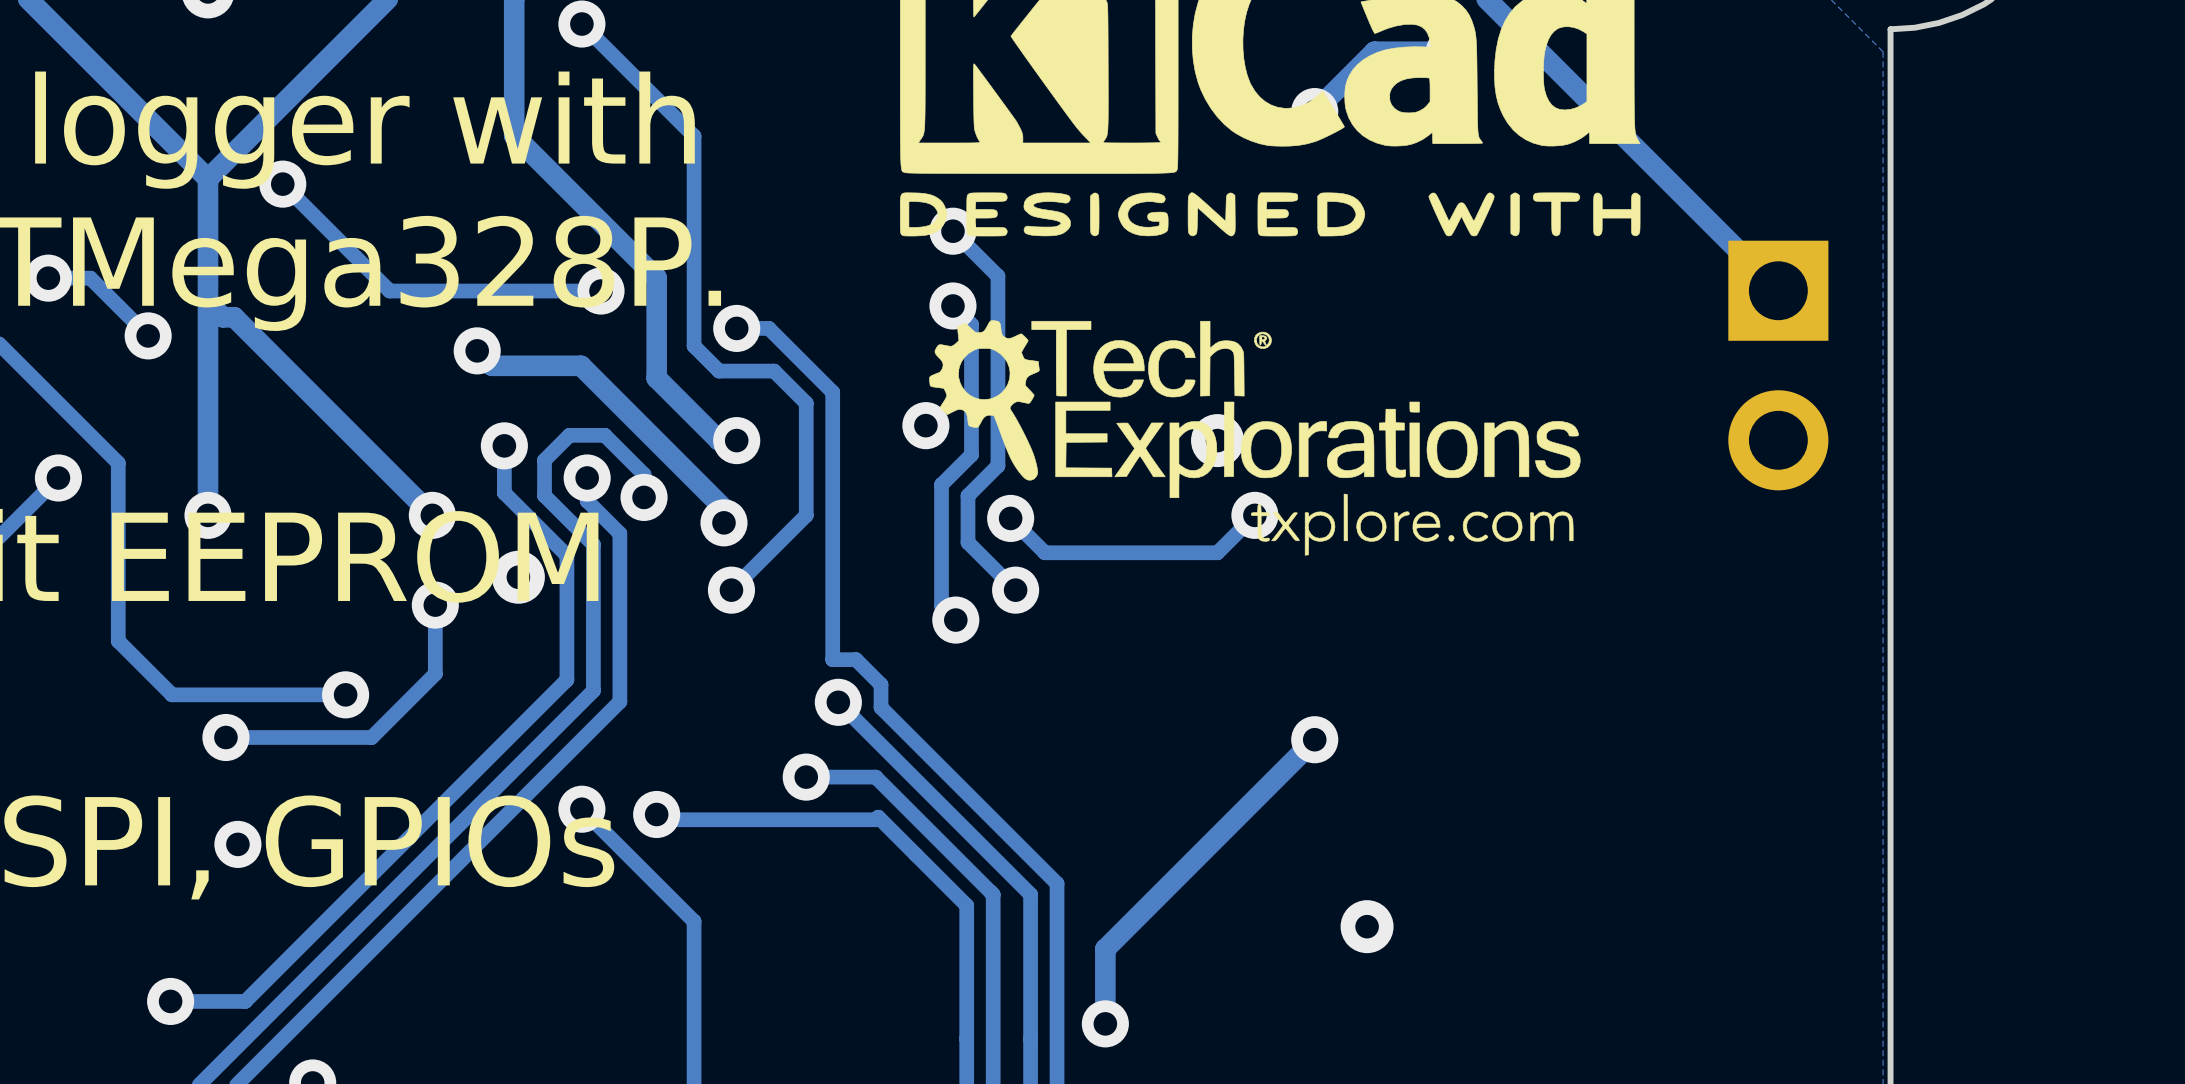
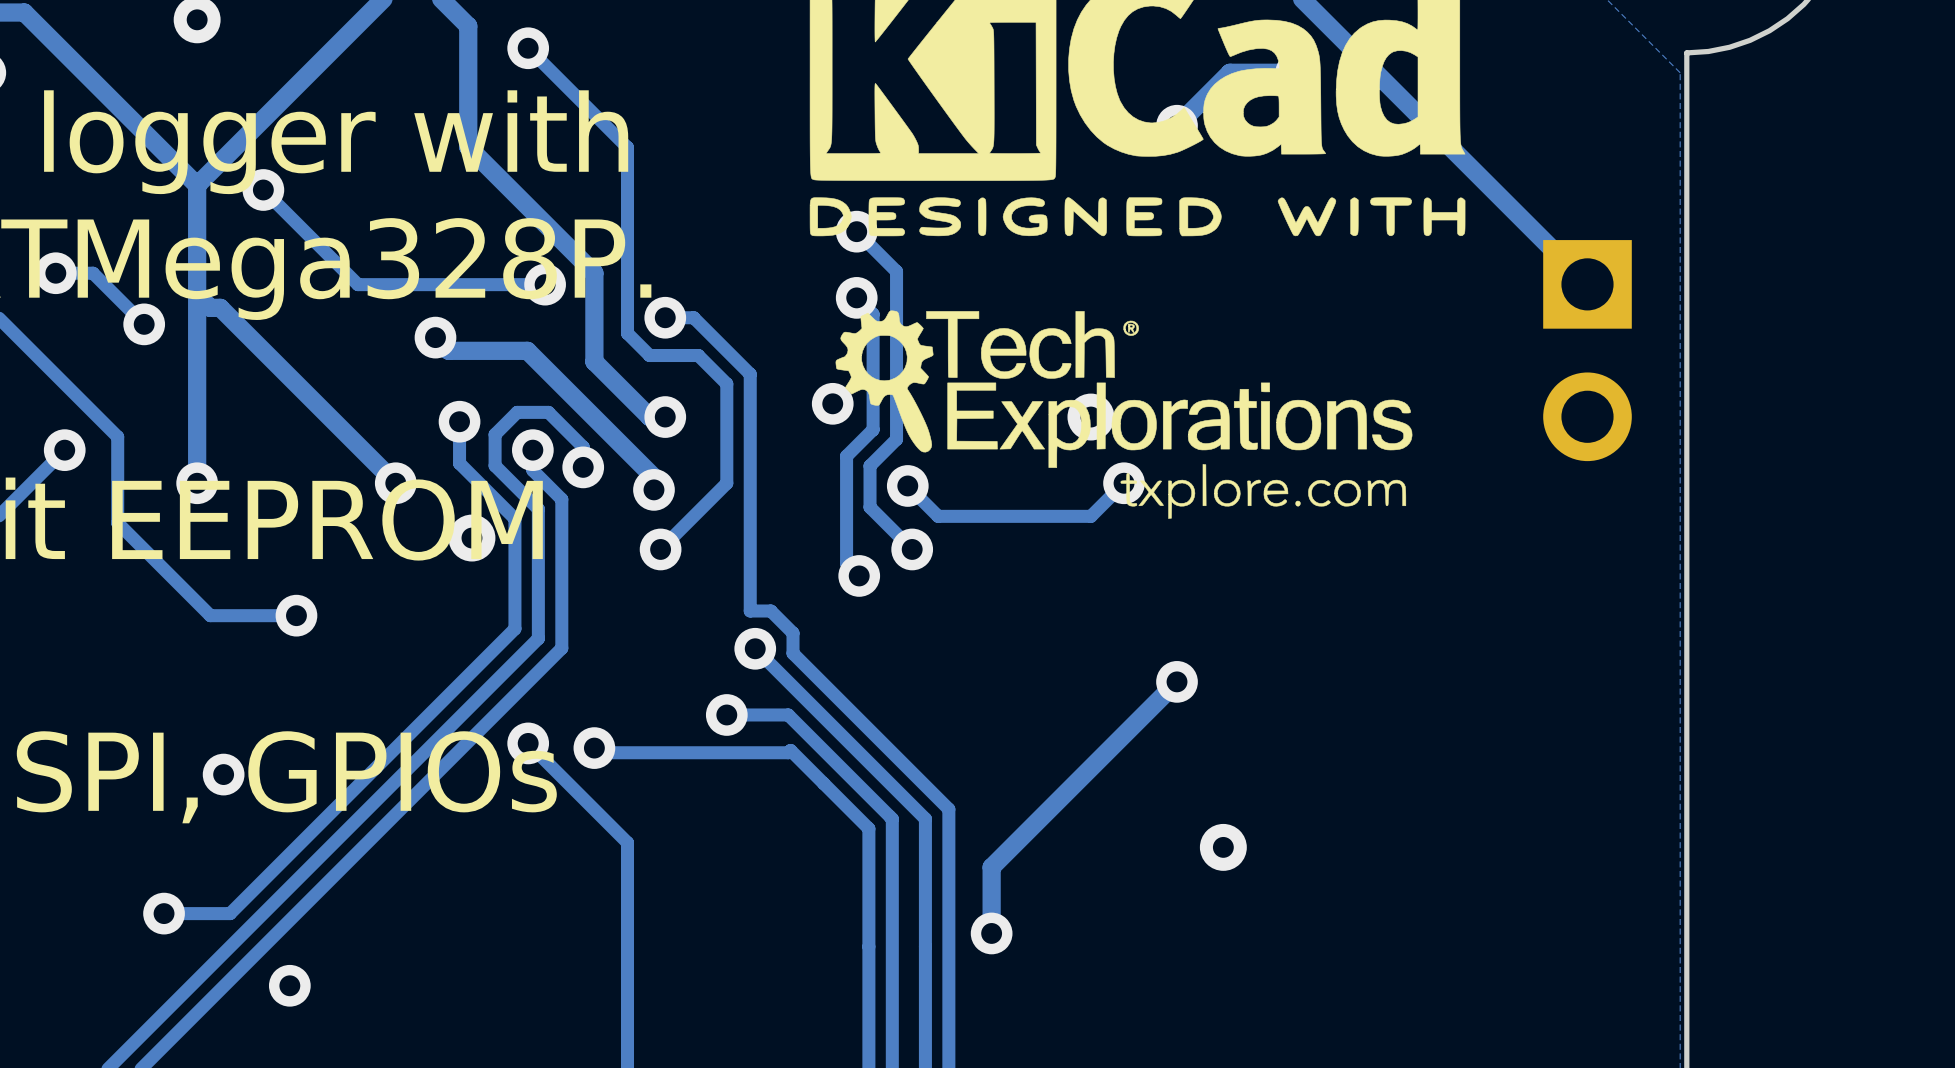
track: (118, 560) (118, 641) (172, 694) (345, 694) -> (117, 522) (210, 615) (296, 615)
track: (435, 605) (435, 673) (371, 737) (225, 737) -> none
via: (435, 605) -> none
via position: (345, 694) -> (296, 615)
via: (225, 737) -> none

